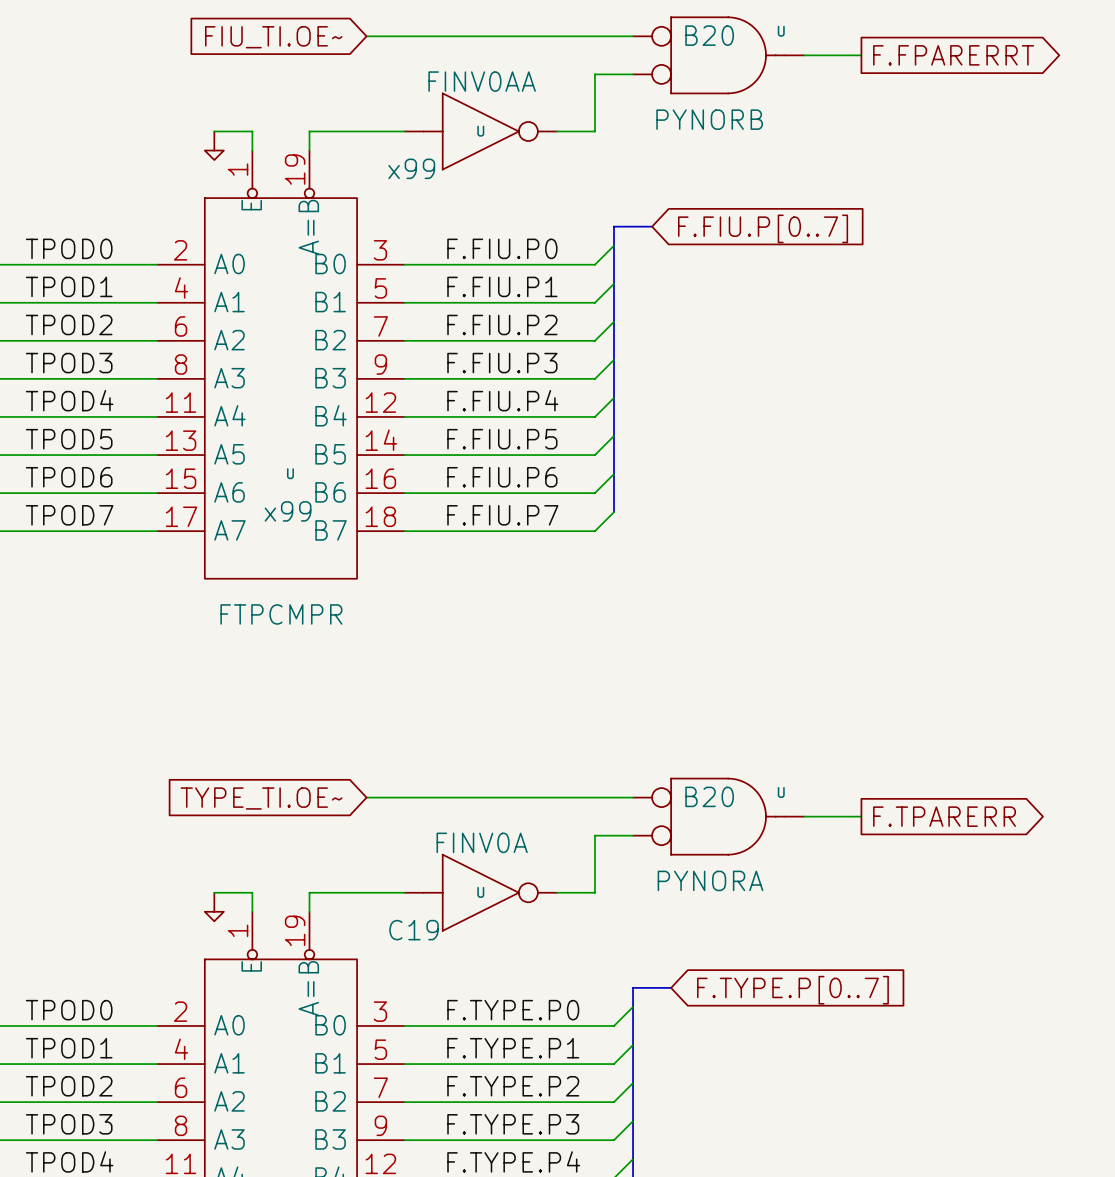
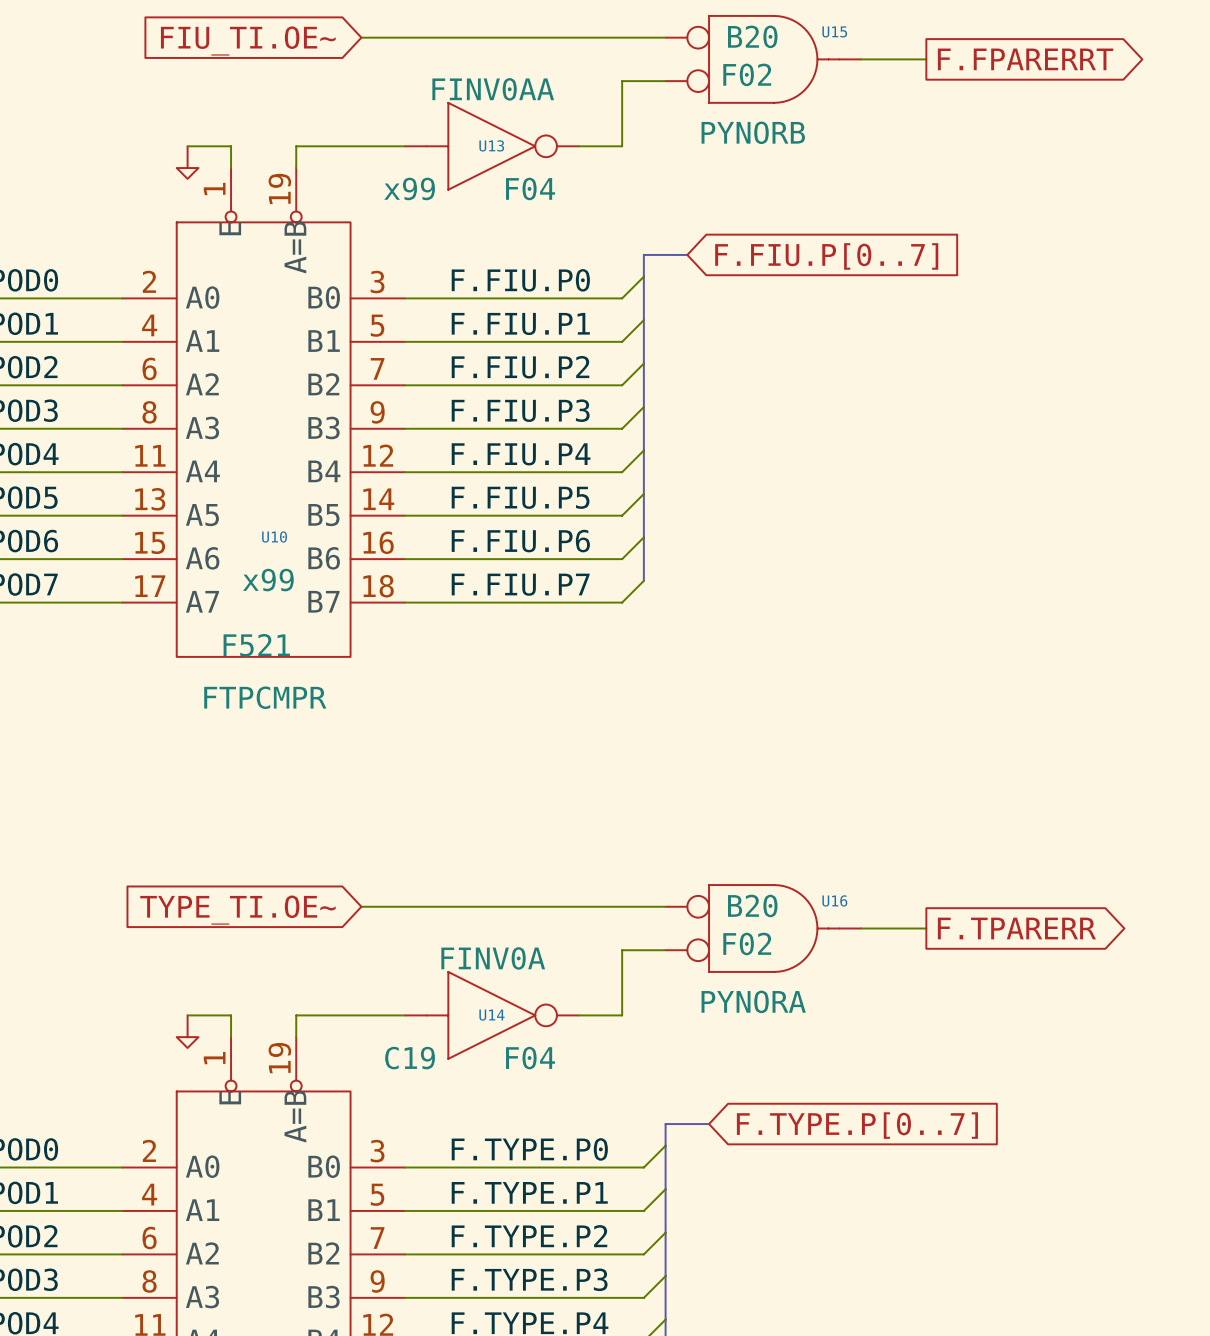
U name: U (781, 31) -> U15 (834, 31)
U value: none -> F02 (747, 74)
U name: U (480, 131) -> U13 (491, 145)
U value: none -> F04 (530, 188)
U name: U (290, 473) -> U10 (274, 537)
U value: none -> F521 (256, 645)
U name: U (781, 792) -> U16 (834, 900)
U value: none -> F02 (747, 944)
U name: U (480, 892) -> U14 (491, 1015)
U value: none -> F04 (530, 1058)

